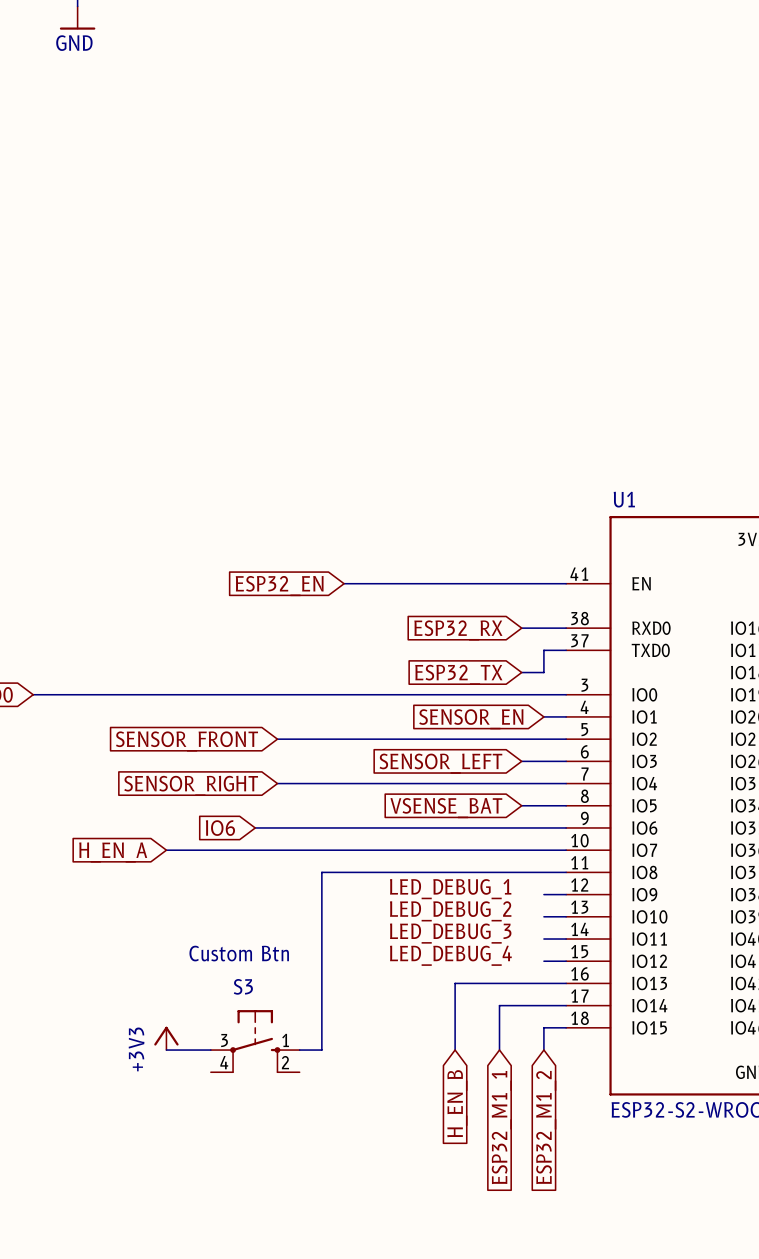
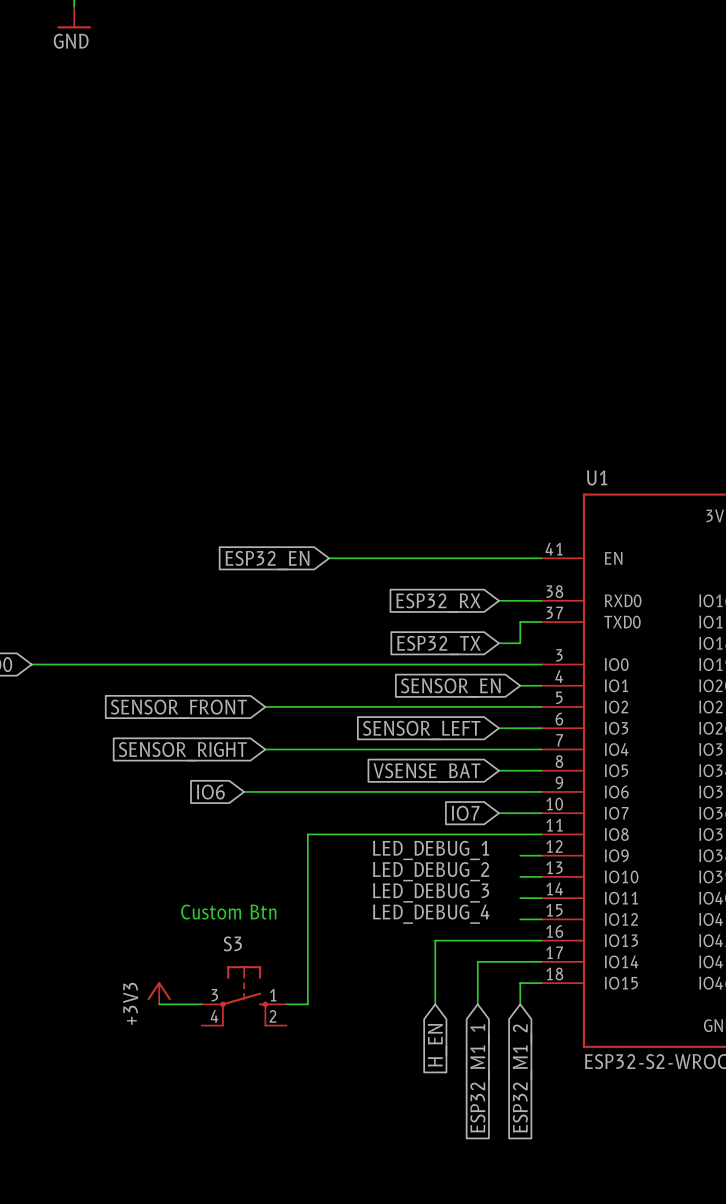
wire: (166, 850) (521, 850) -> none
global label: none -> IO7 (465, 813)
global label: H_EN_A (113, 852) -> none
global label: H_EN_B (457, 1103) -> H_EN (437, 1045)

